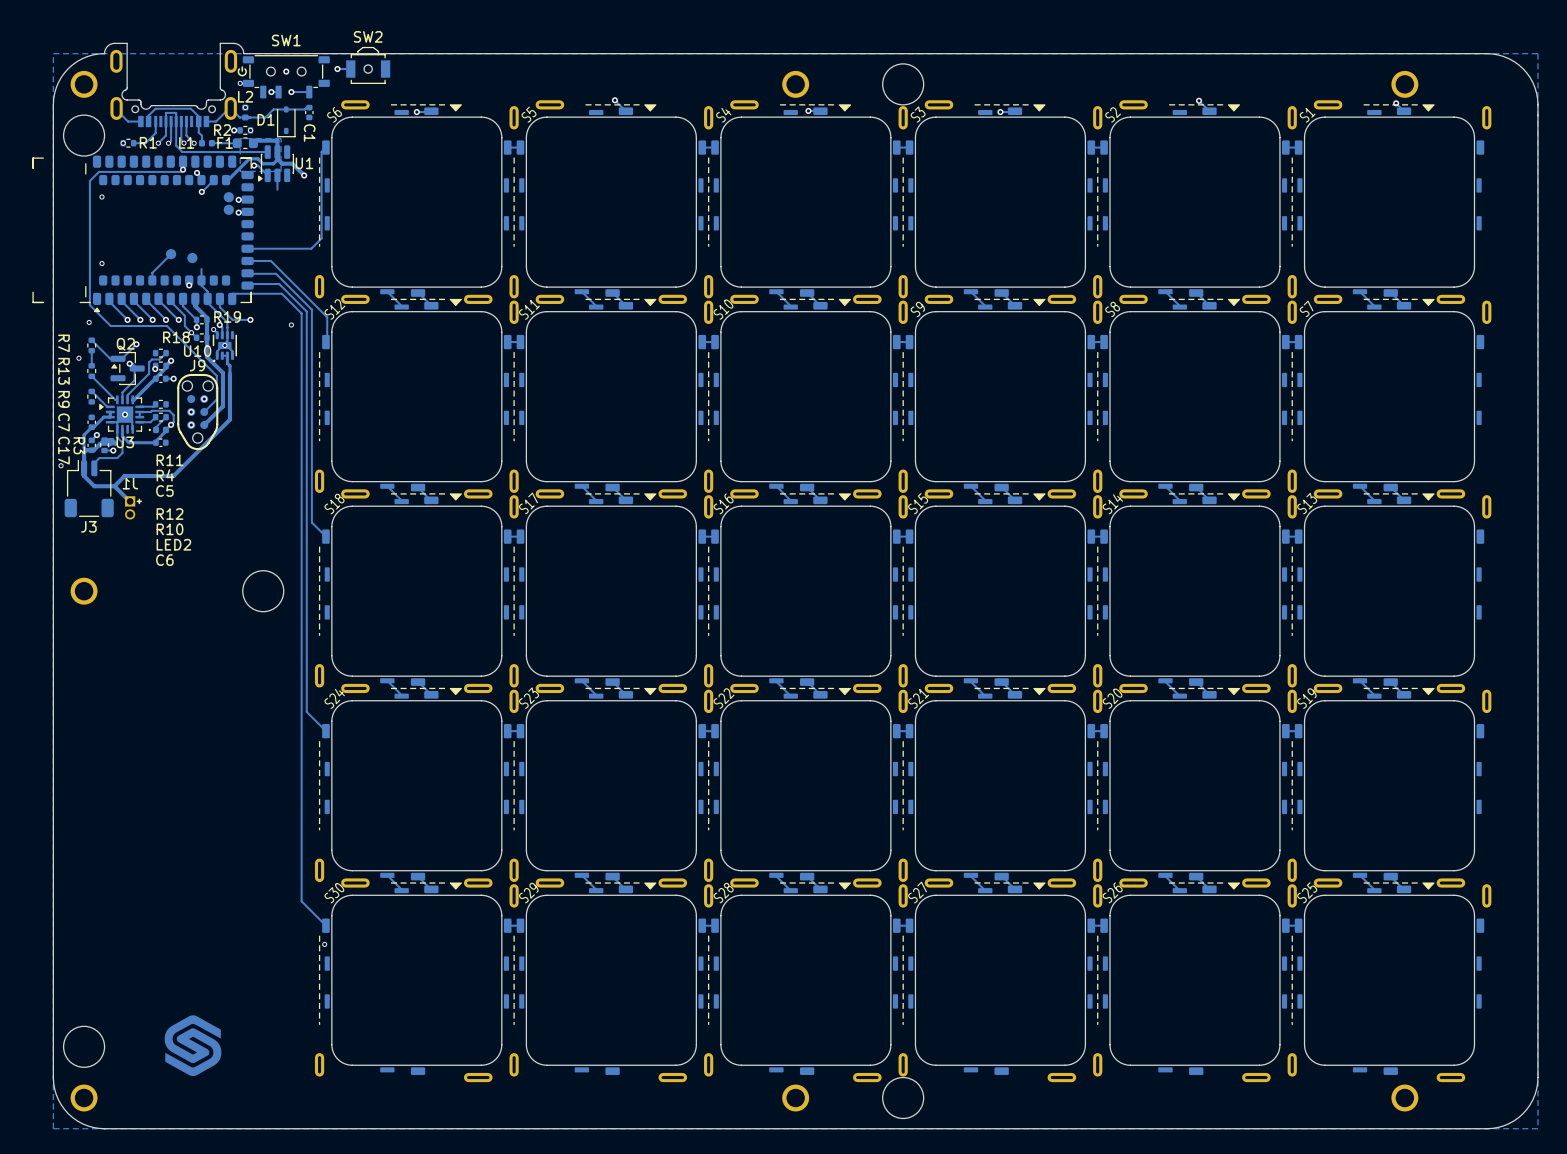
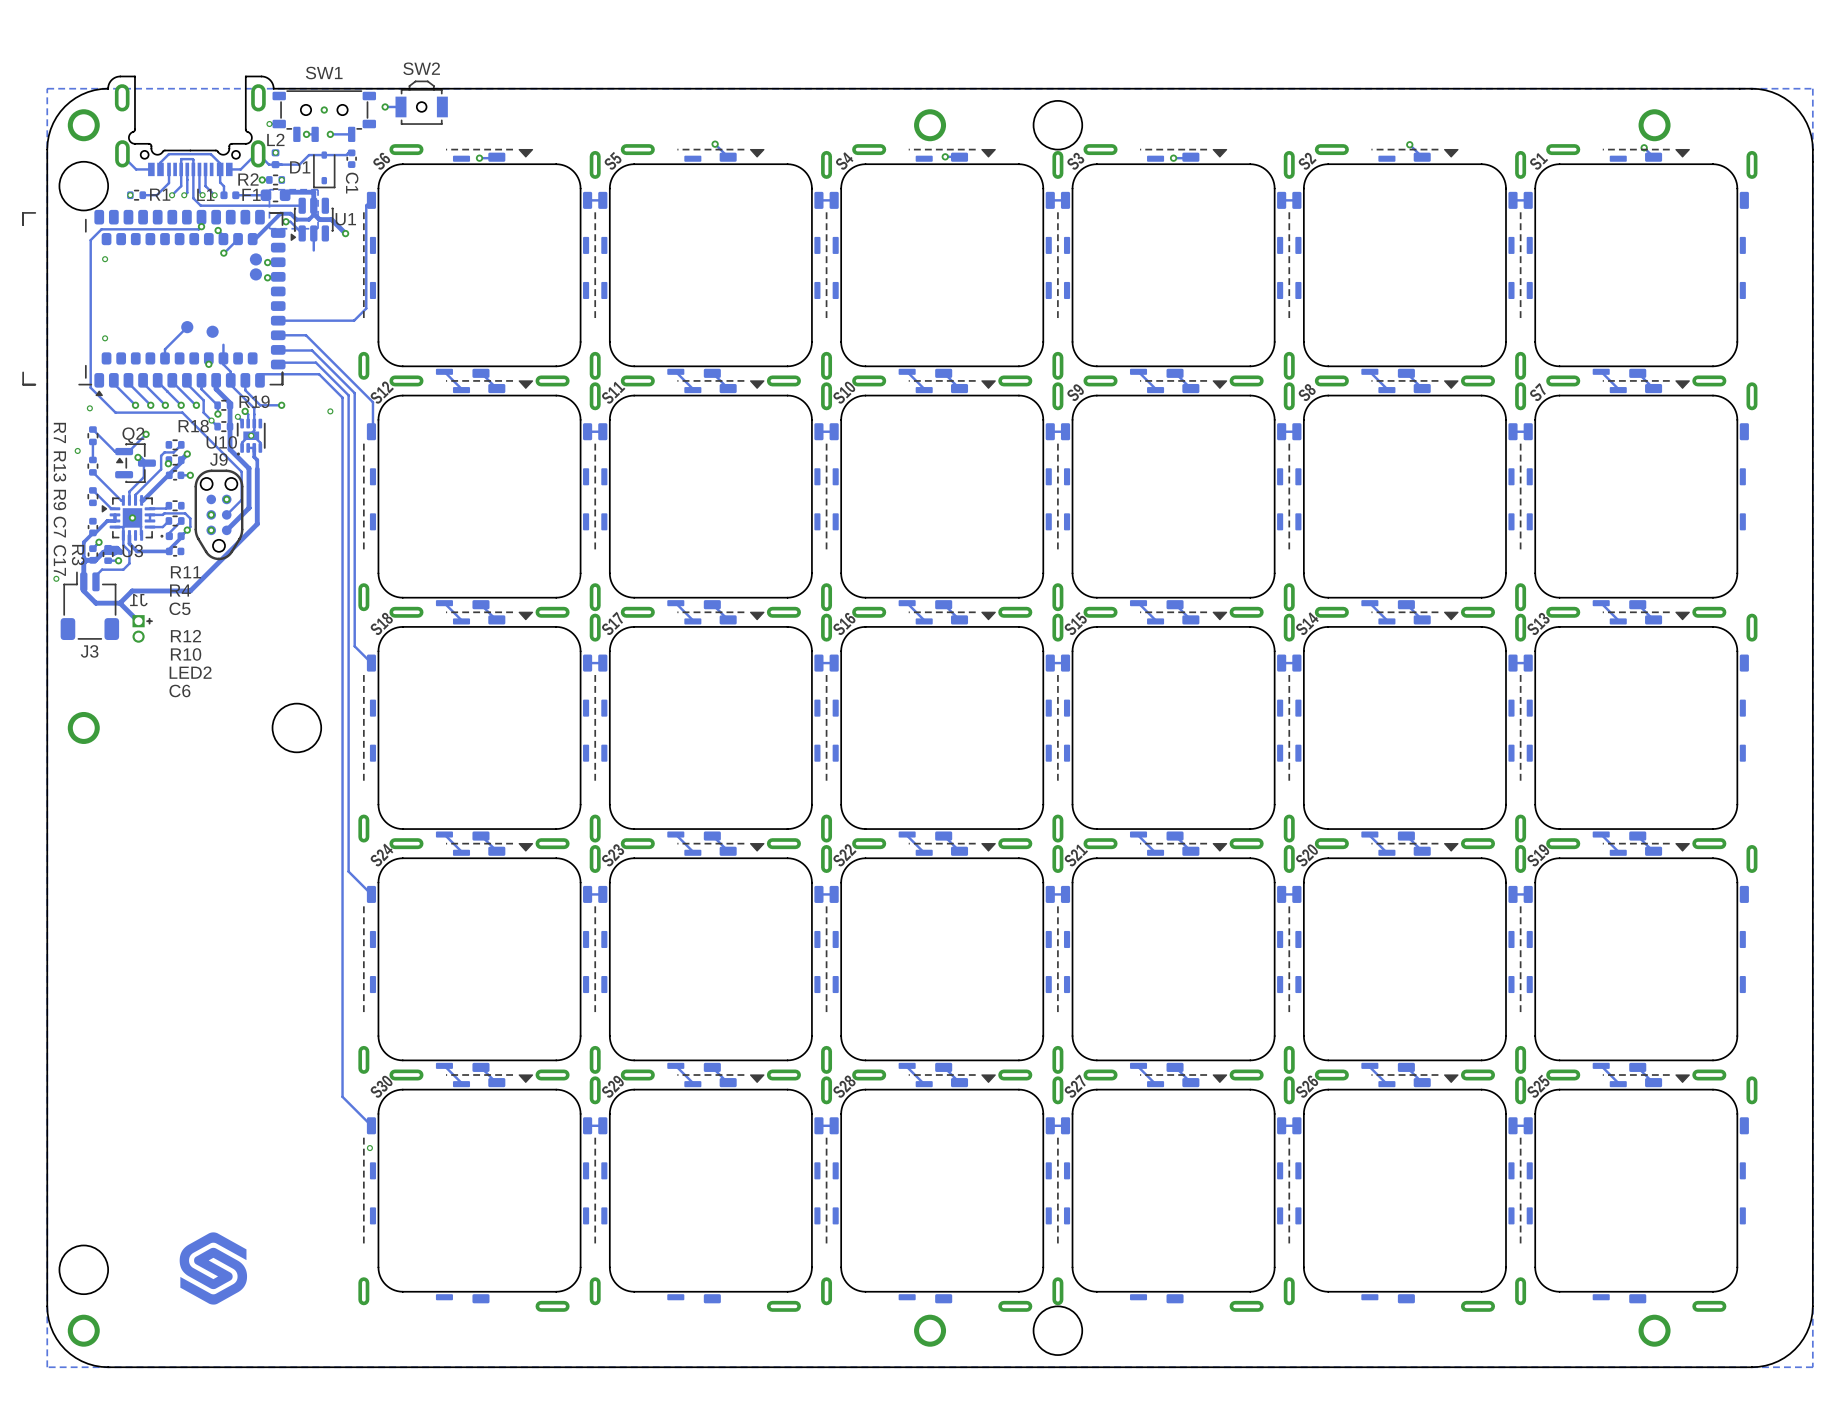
line: (242, 66) (242, 71) -> none
line: (245, 68) (245, 73) (242, 75) (238, 73) (239, 69) -> none

